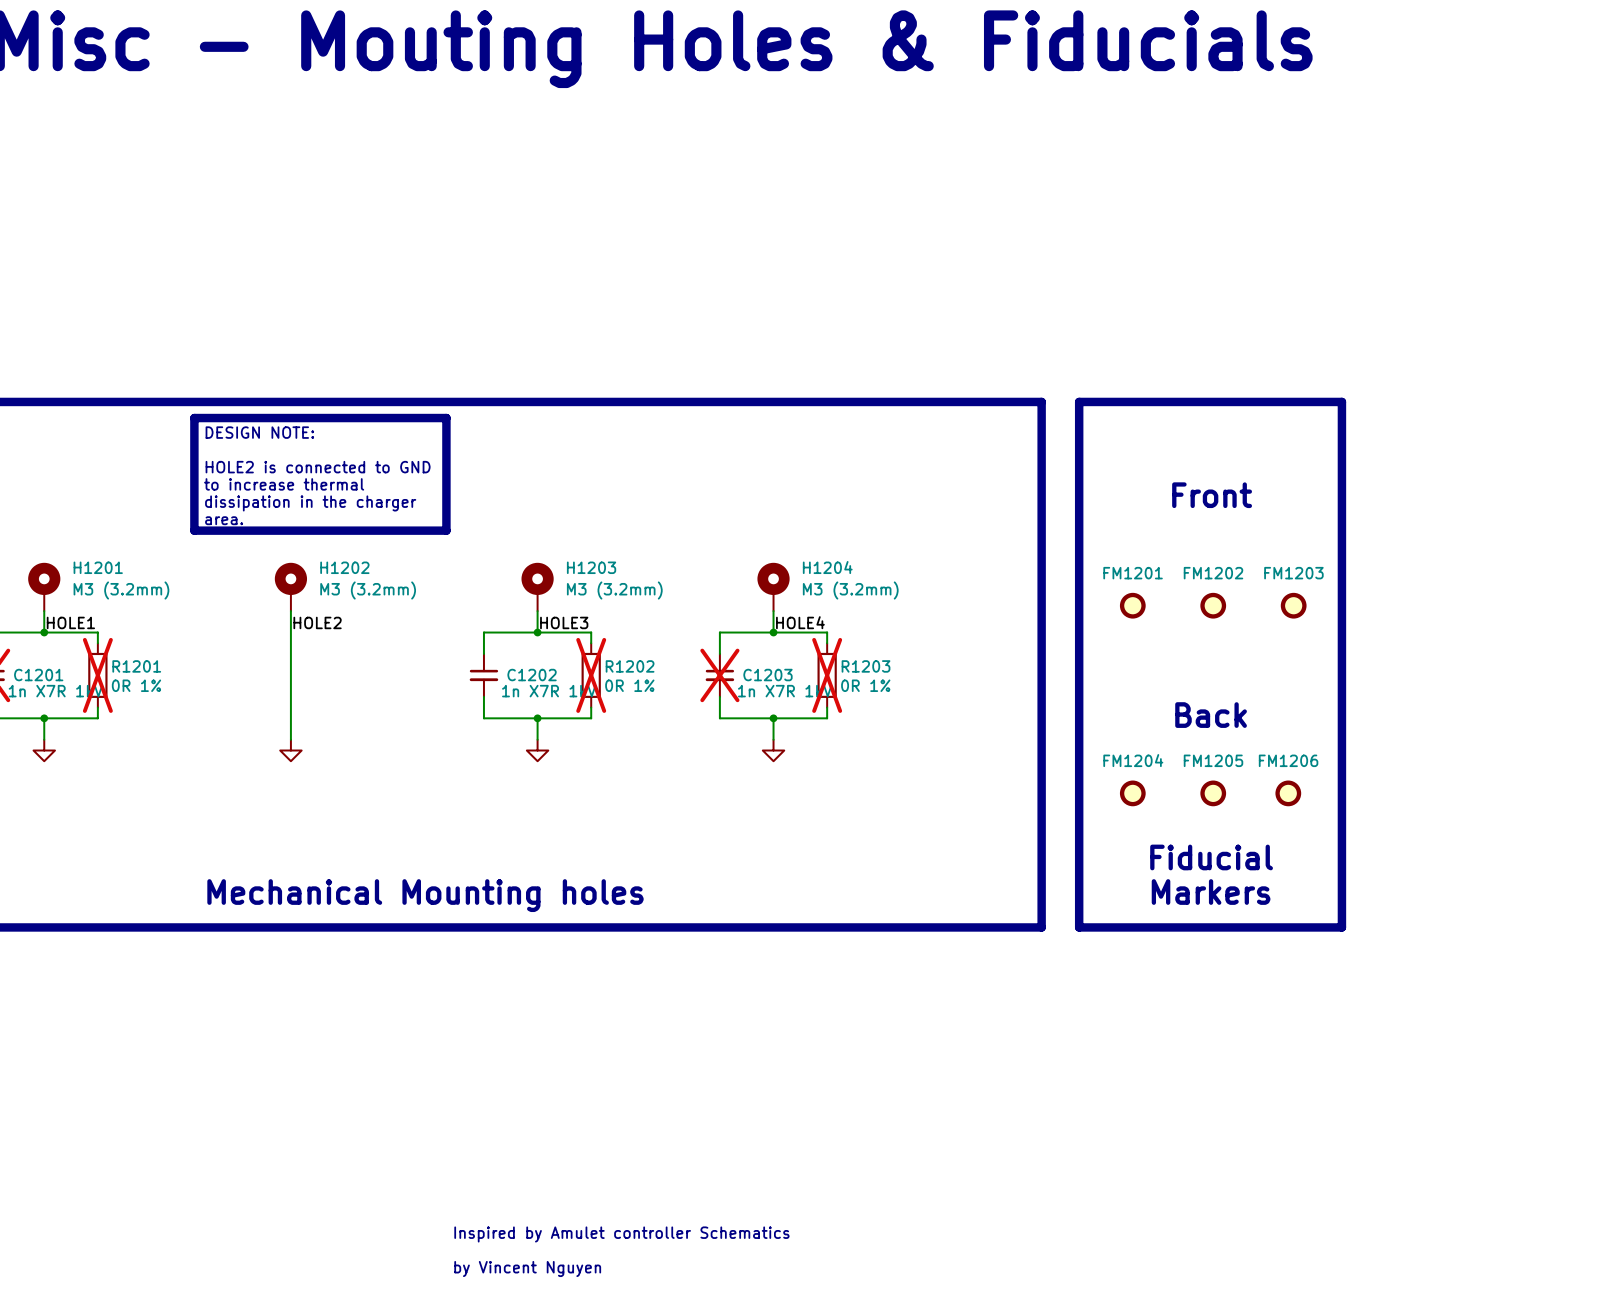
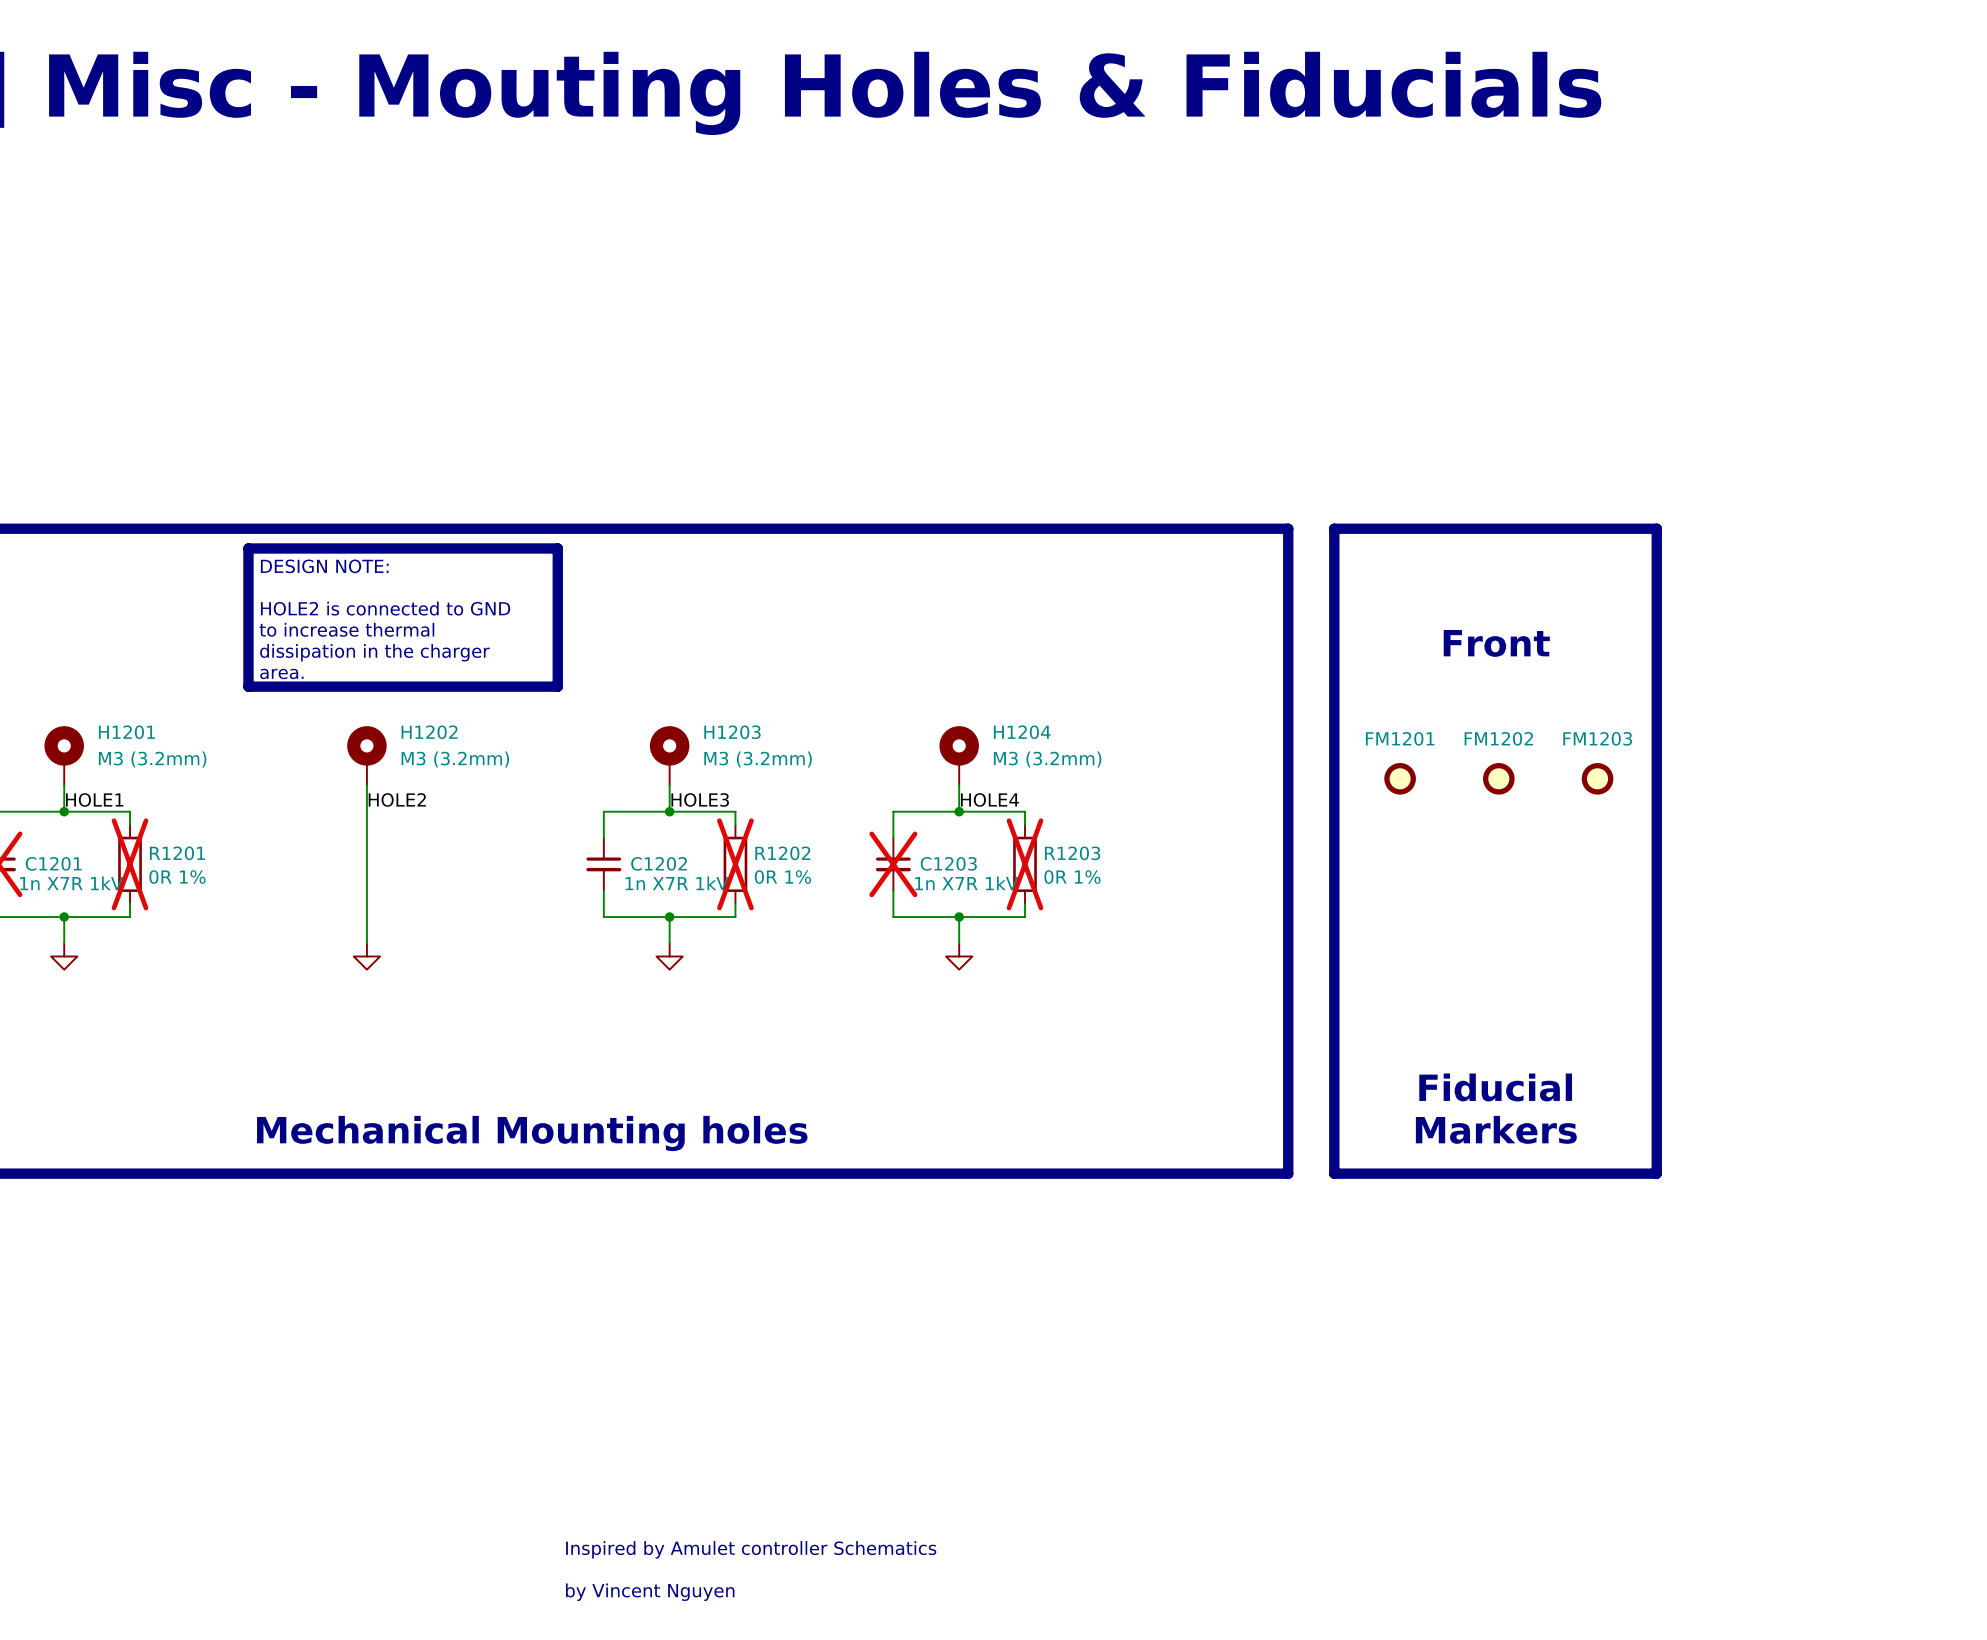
text: Back (1211, 715) -> none
FM1204: (1132, 793) -> none
FM1205: (1213, 793) -> none
FM1206: (1288, 793) -> none

